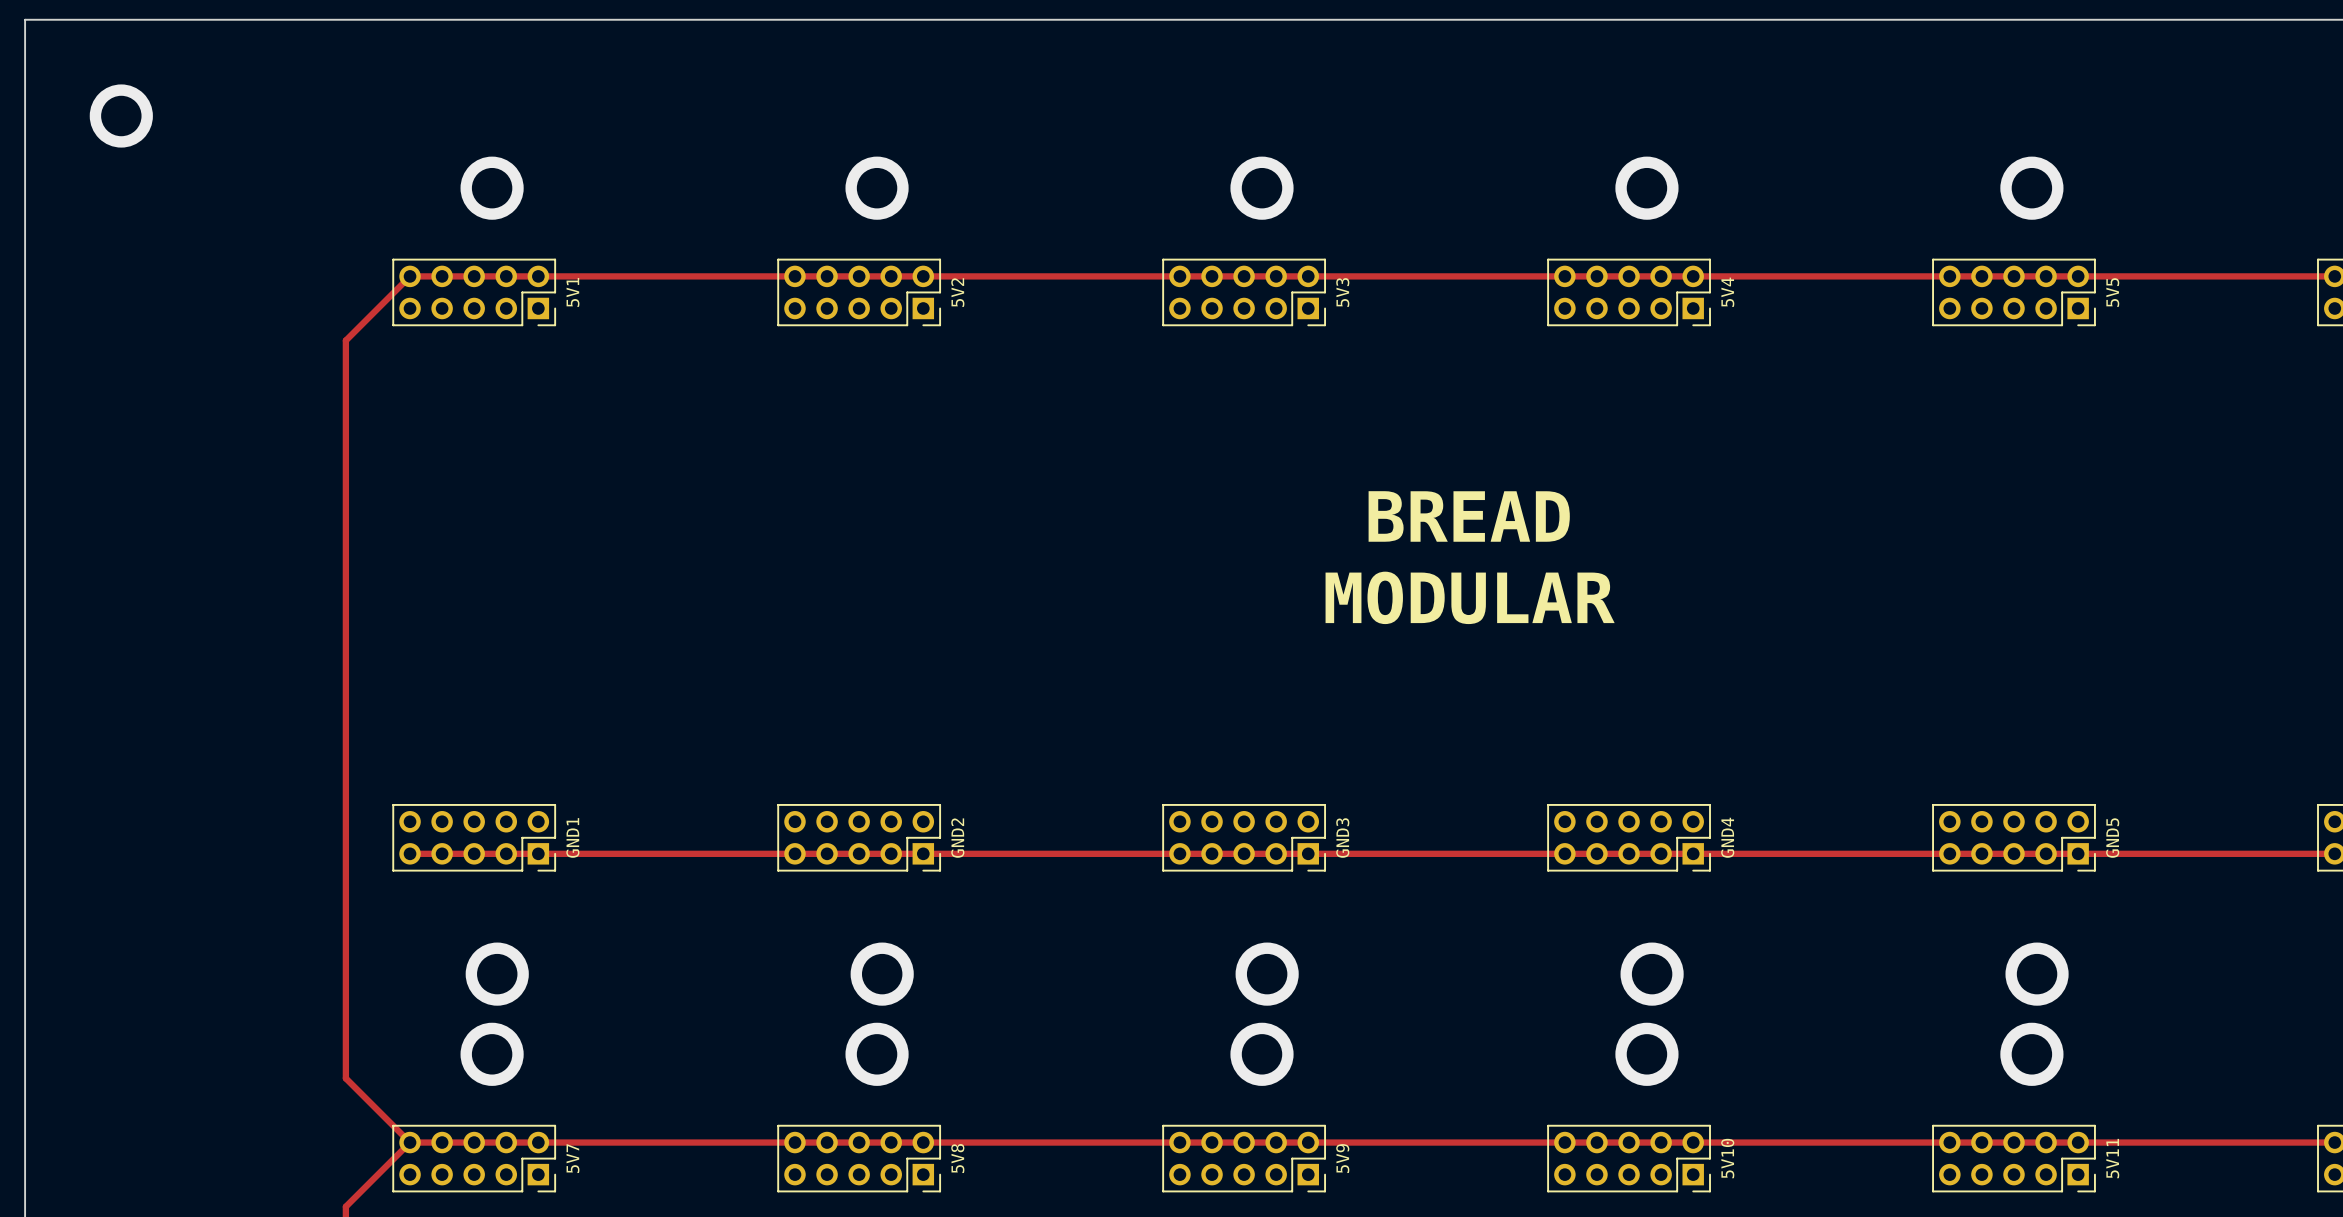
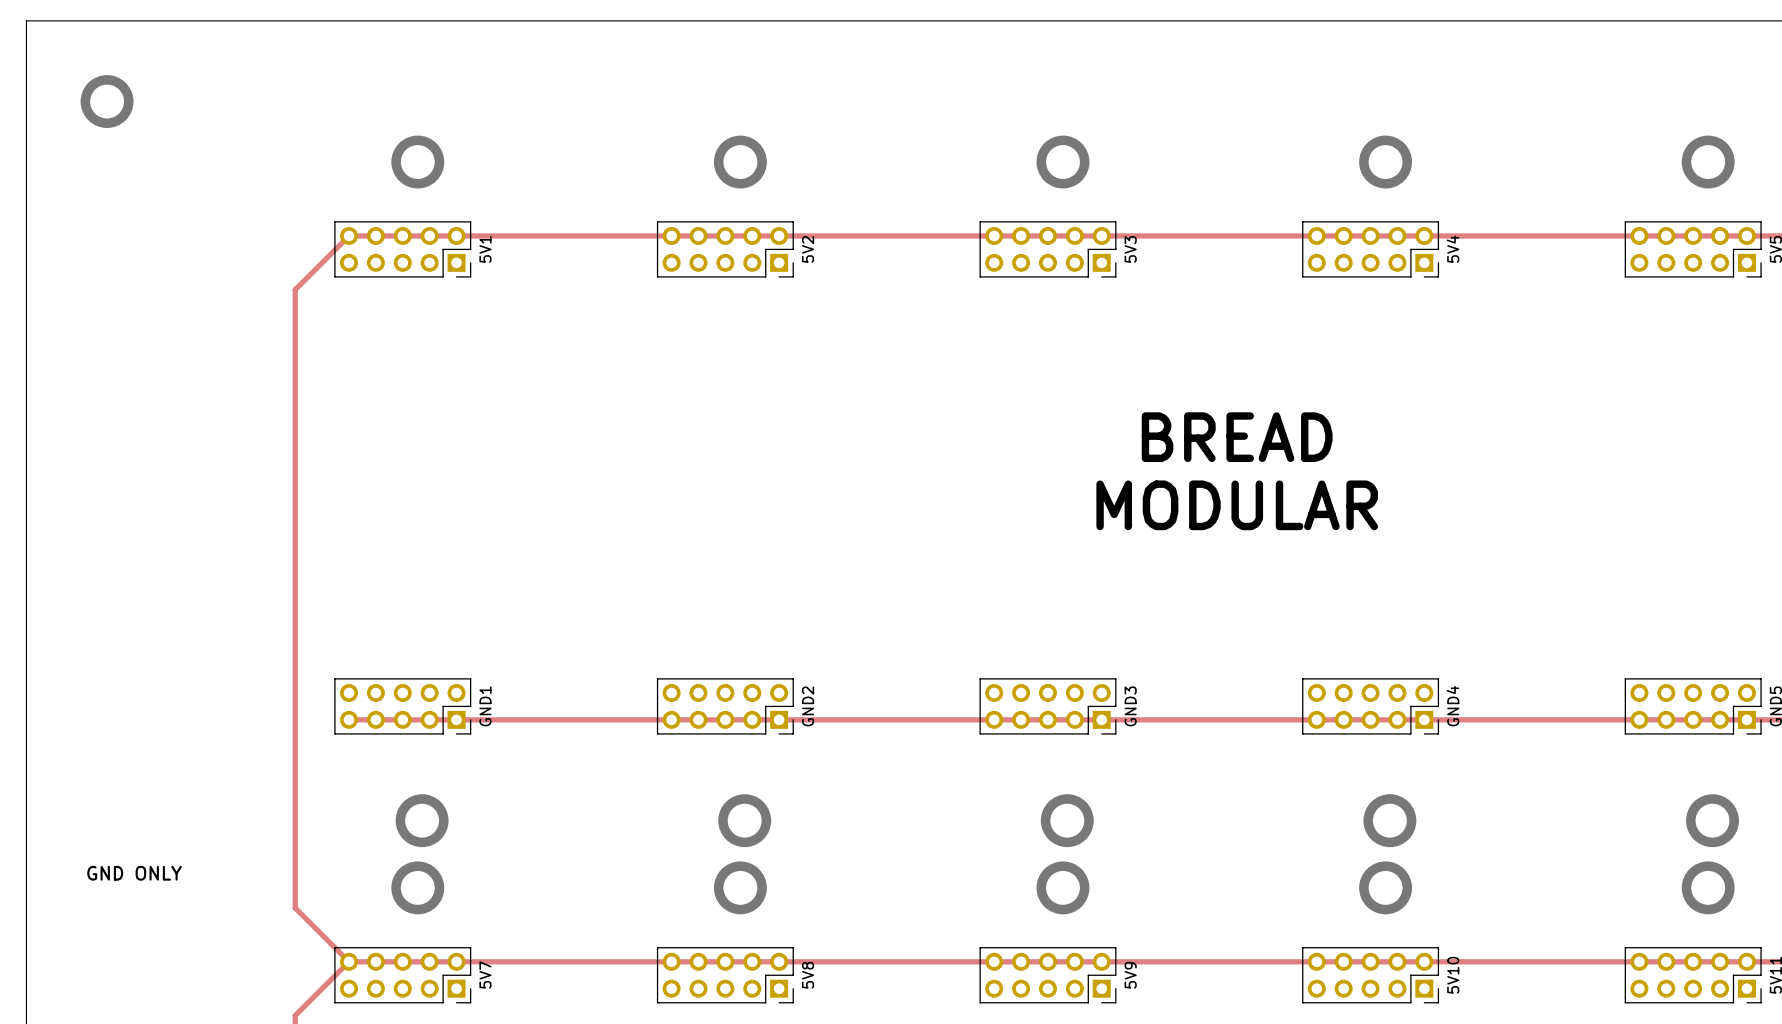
text: none -> GND ONLY (134, 873)

